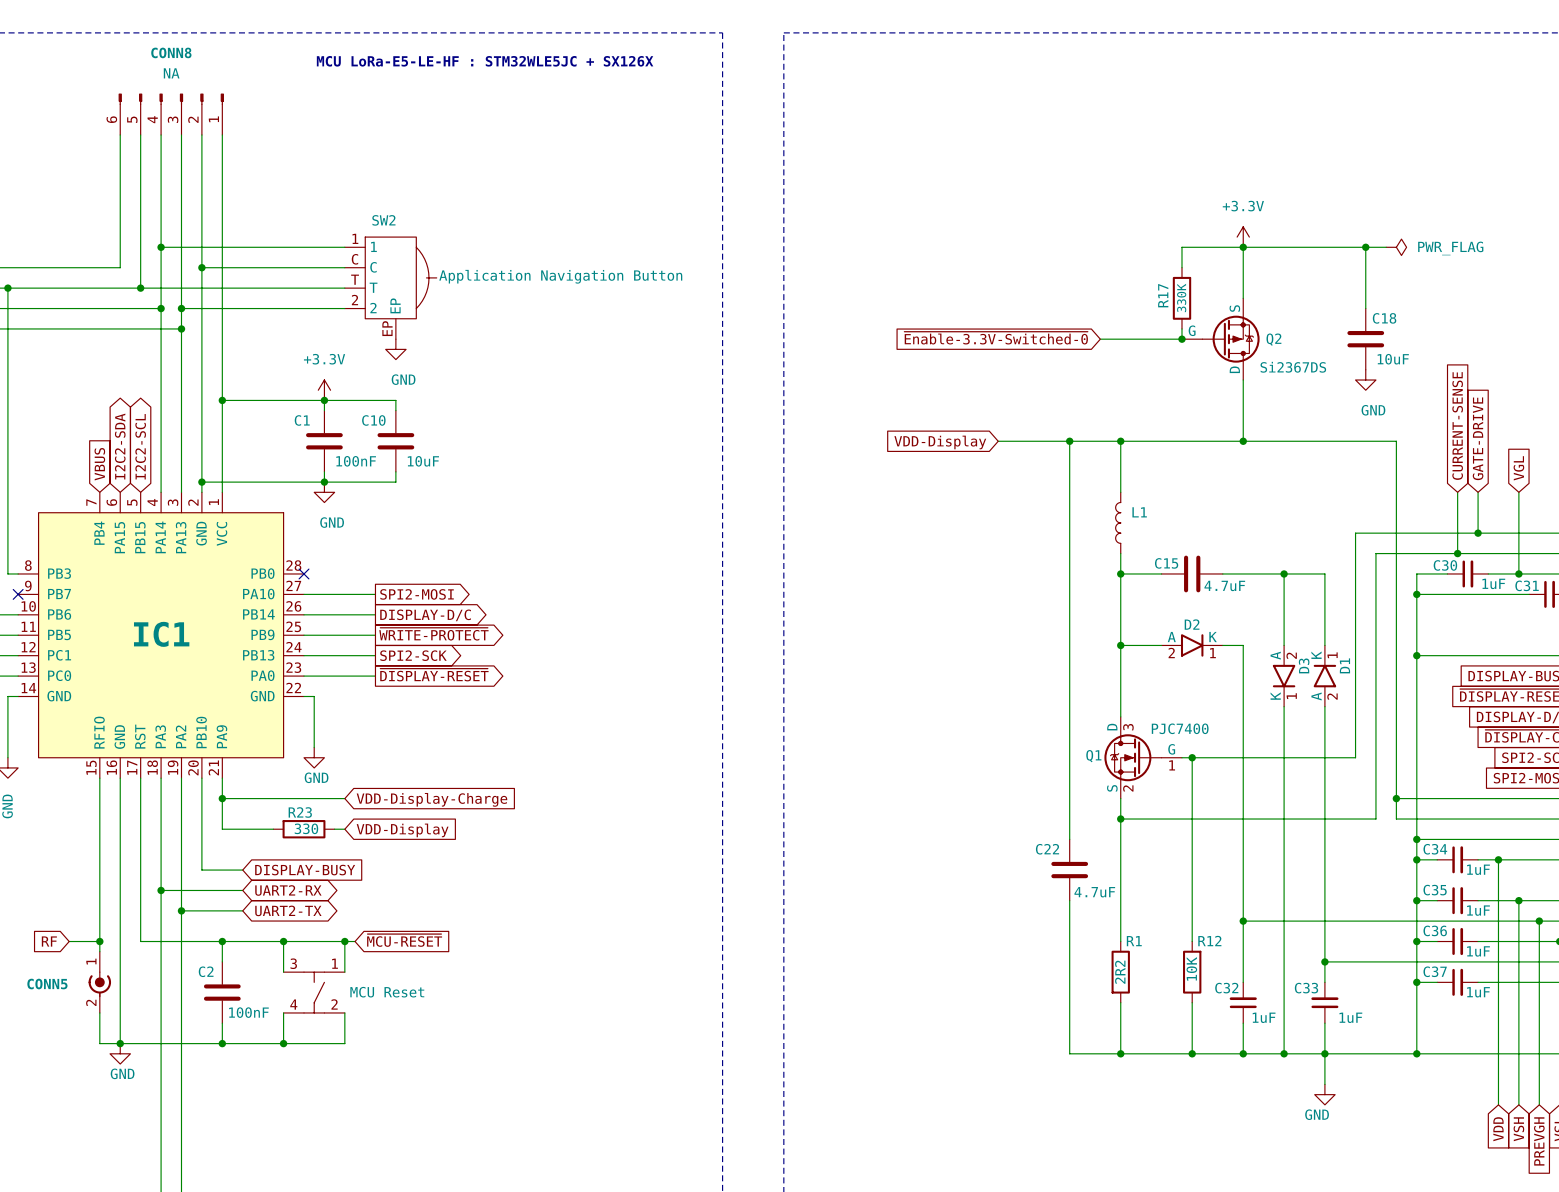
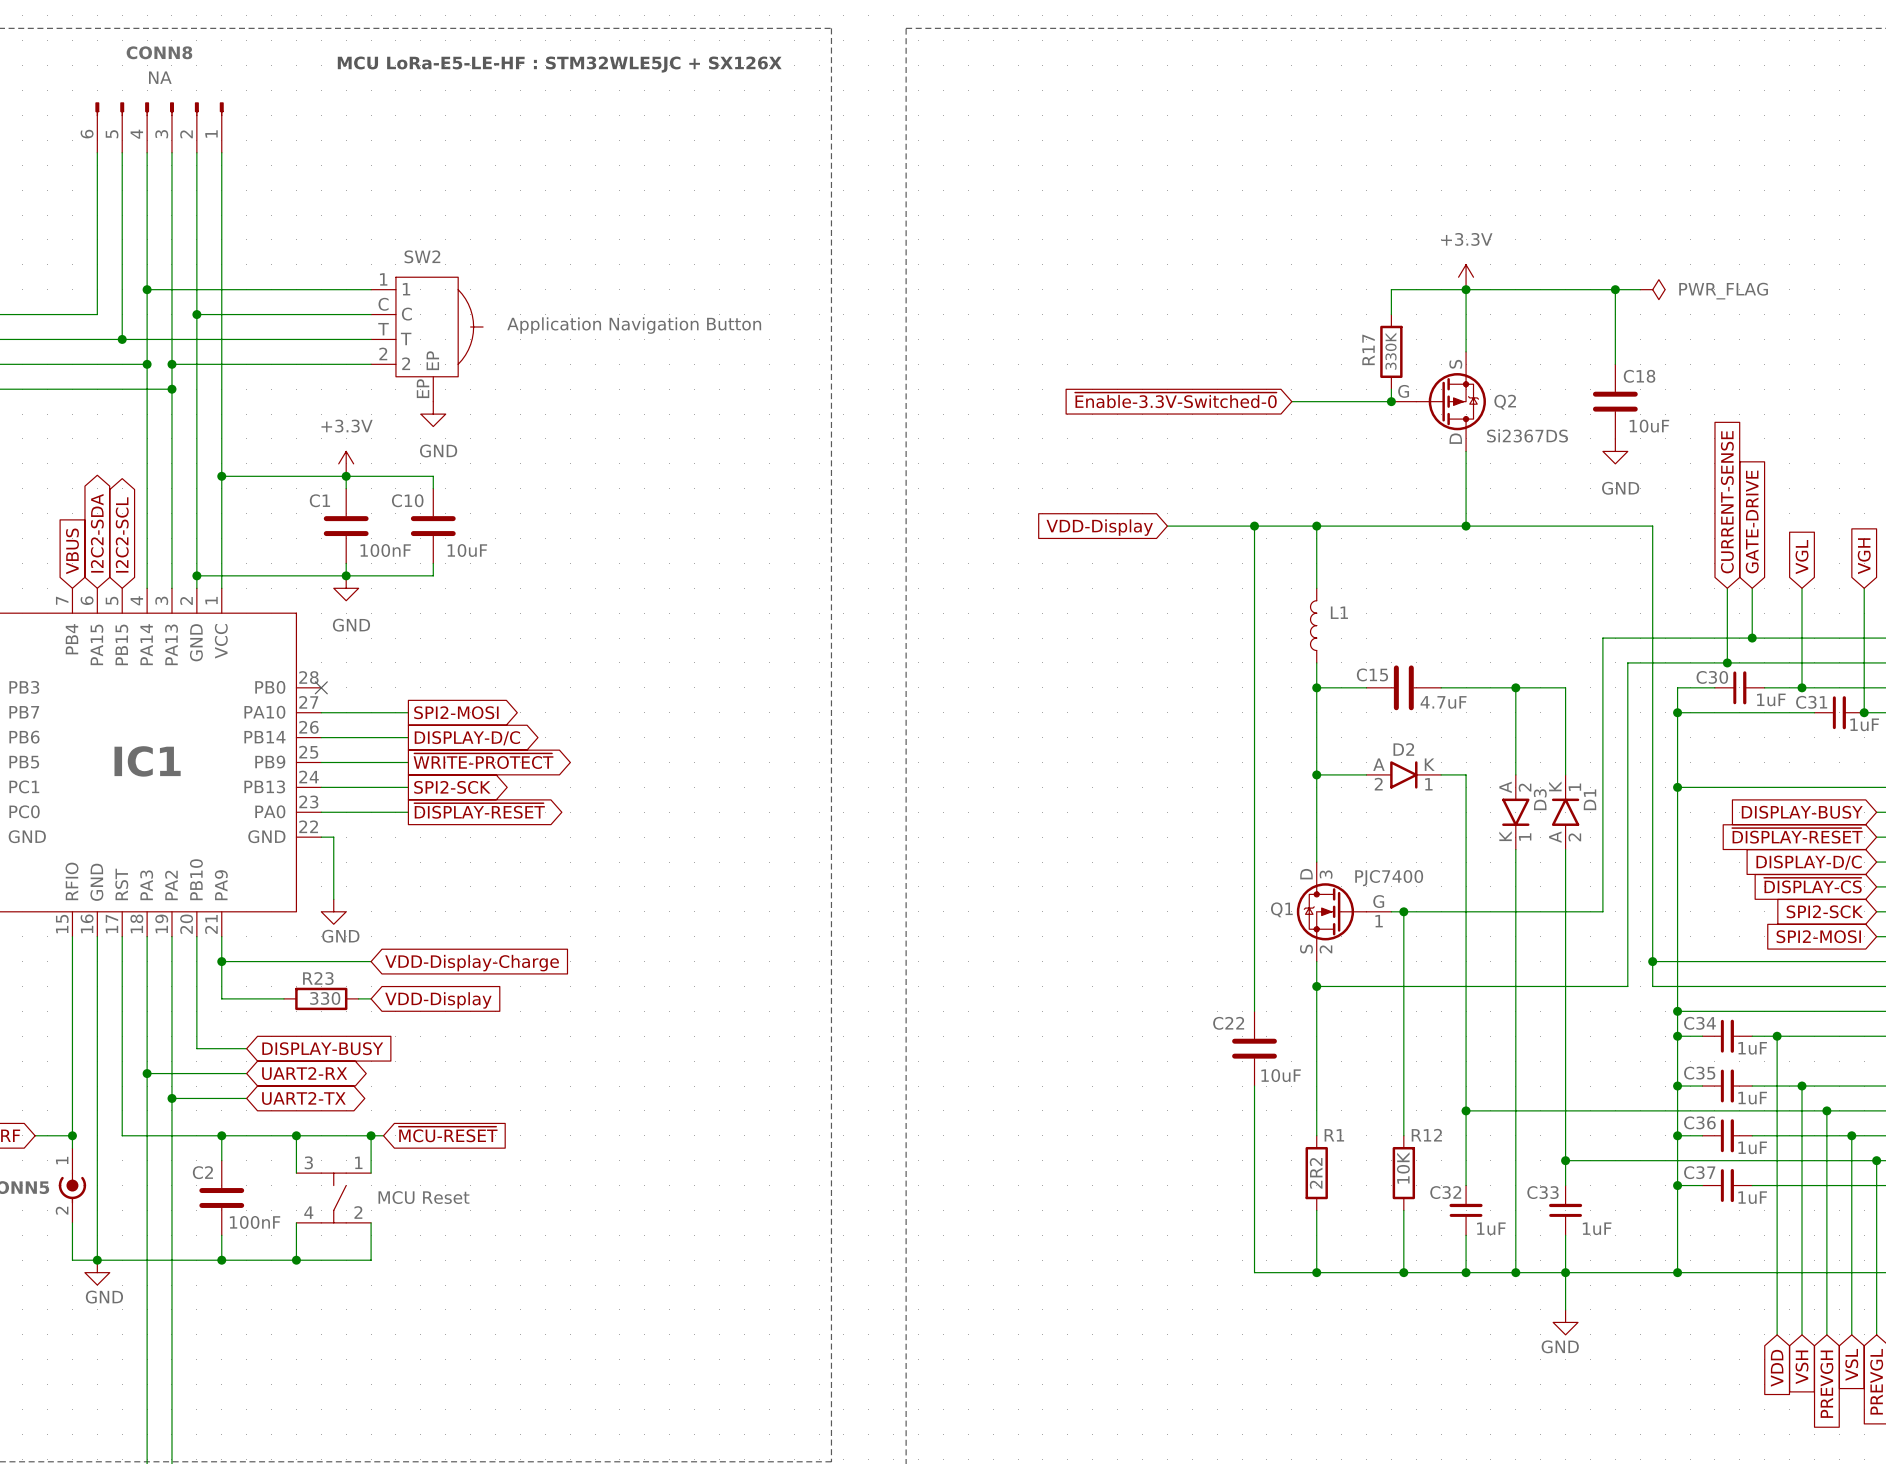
C22 value: 4.7uF (1094, 892) -> 10uF (1281, 1075)

